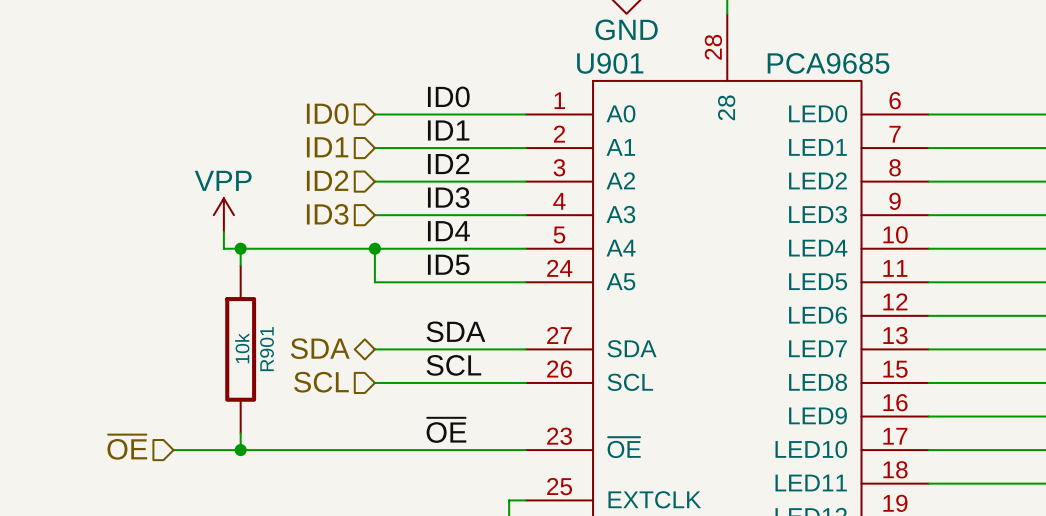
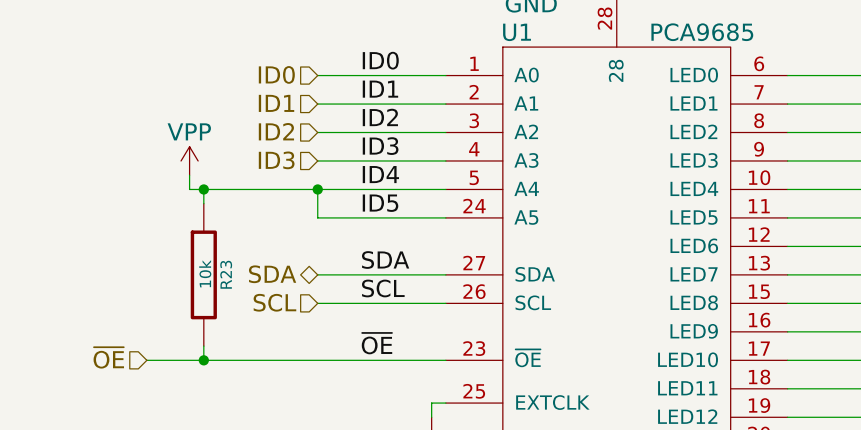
U901 name: U901 (610, 63) -> U1 (517, 32)
R901 name: R901 (267, 349) -> R23 (226, 274)

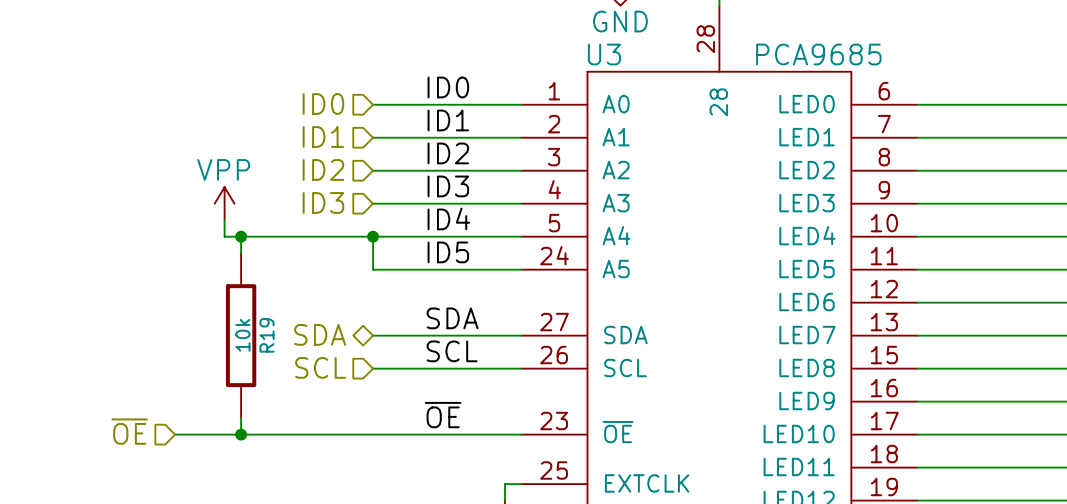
U1 name: U1 (517, 32) -> U3 (604, 54)
R23 name: R23 (226, 274) -> R19 (266, 335)

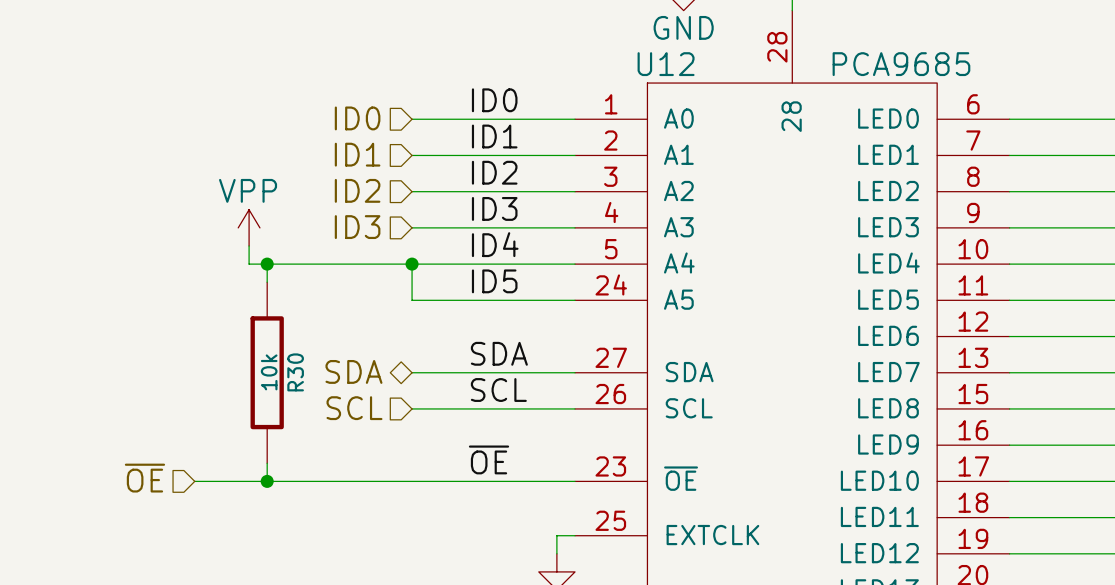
U3 name: U3 (604, 54) -> U12 (666, 64)
R19 name: R19 (266, 335) -> R30 (295, 372)

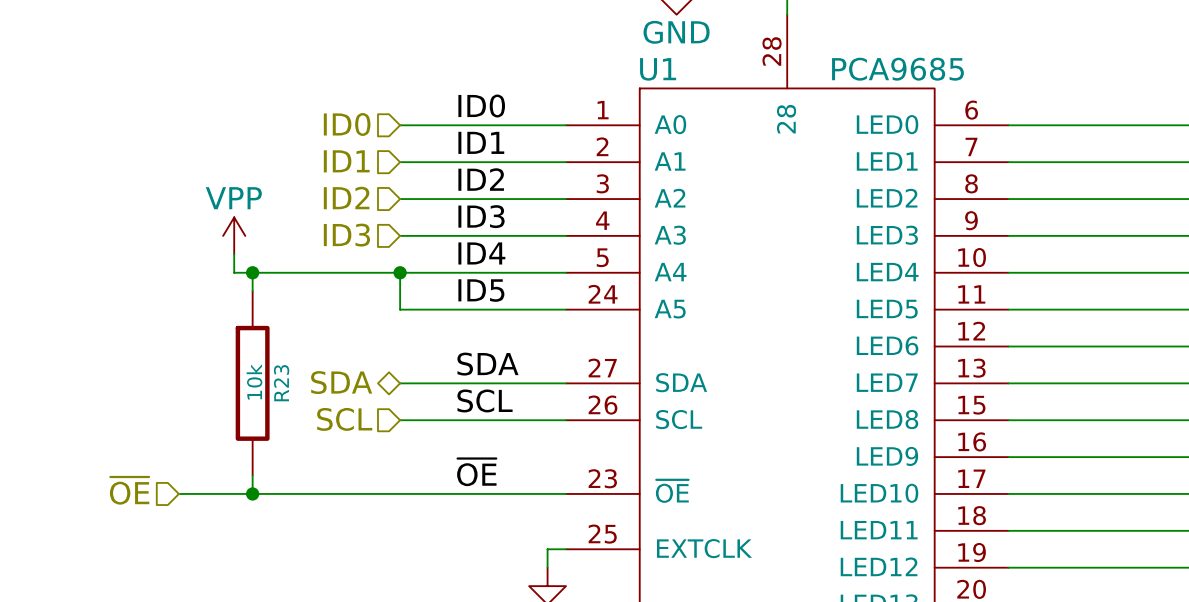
U12 name: U12 (666, 64) -> U1 (658, 69)
R30 name: R30 (295, 372) -> R23 (281, 383)

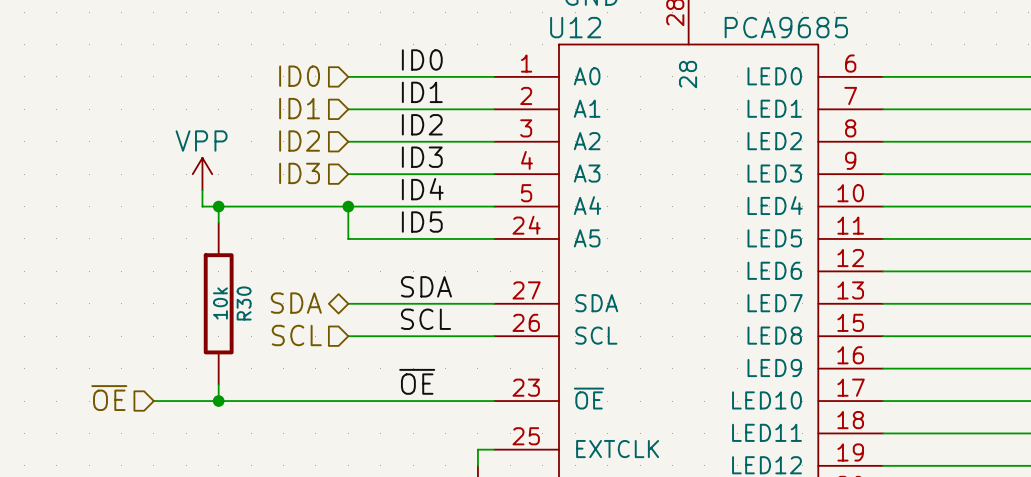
U1 name: U1 (658, 69) -> U12 (575, 27)
R23 name: R23 (281, 383) -> R30 (244, 303)

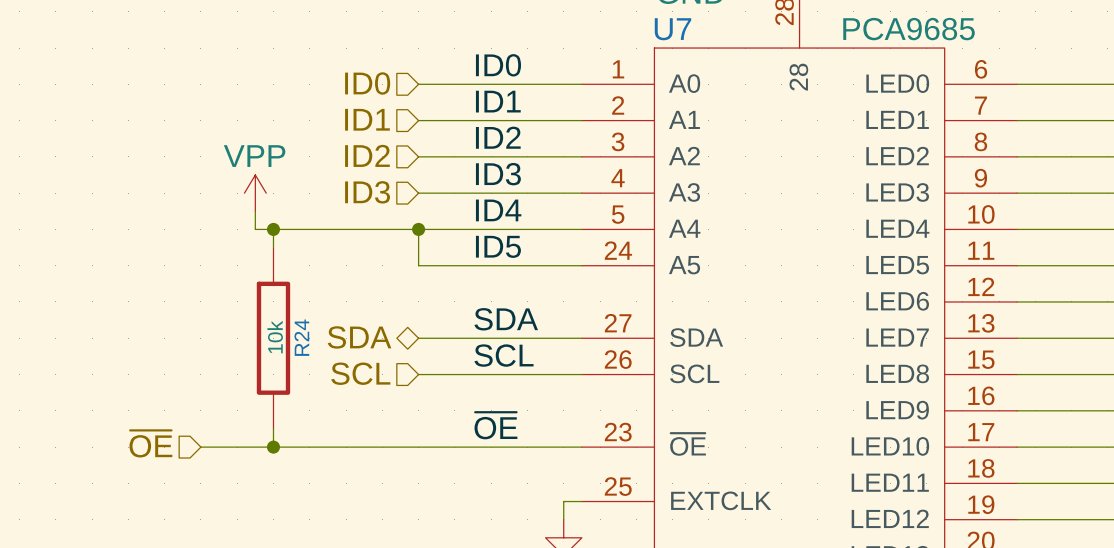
U12 name: U12 (575, 27) -> U7 (672, 29)
R30 name: R30 (244, 303) -> R24 (301, 337)

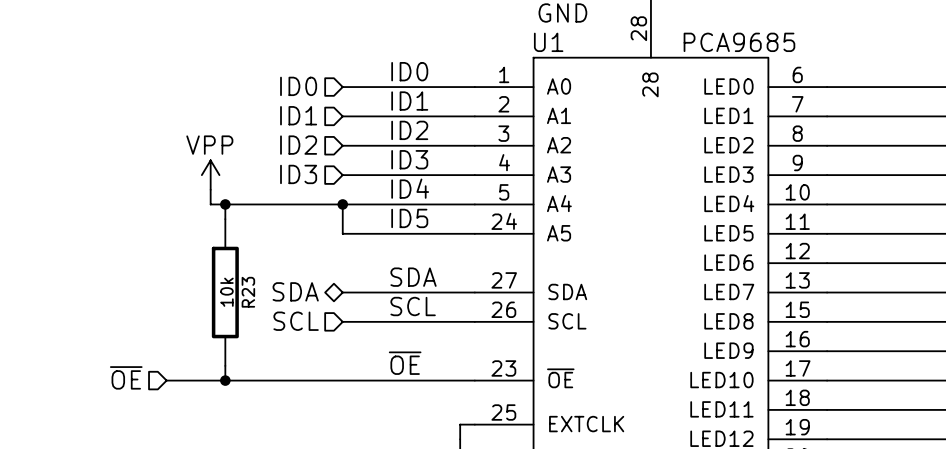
U7 name: U7 (672, 29) -> U1 (548, 42)
R24 name: R24 (301, 337) -> R23 (248, 292)

